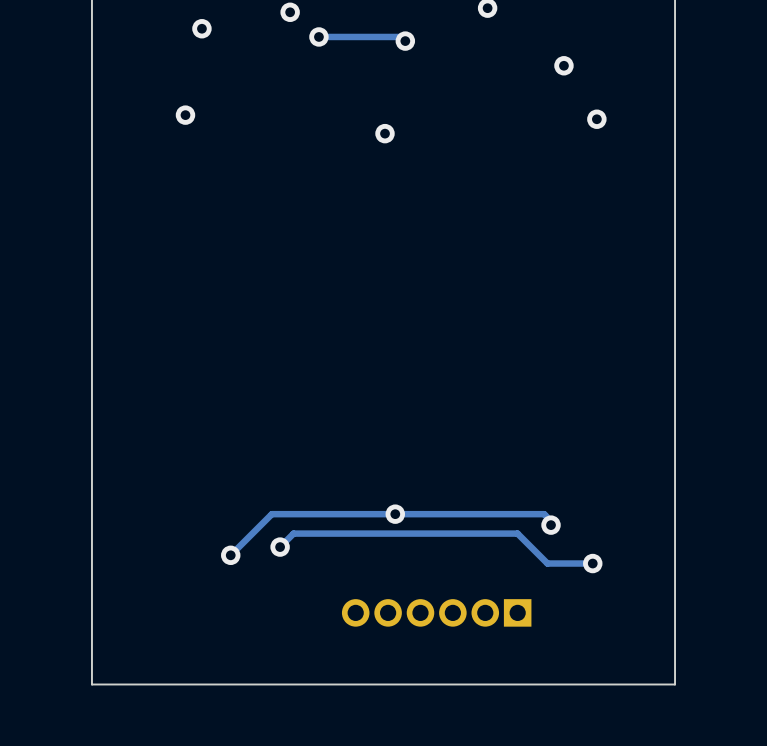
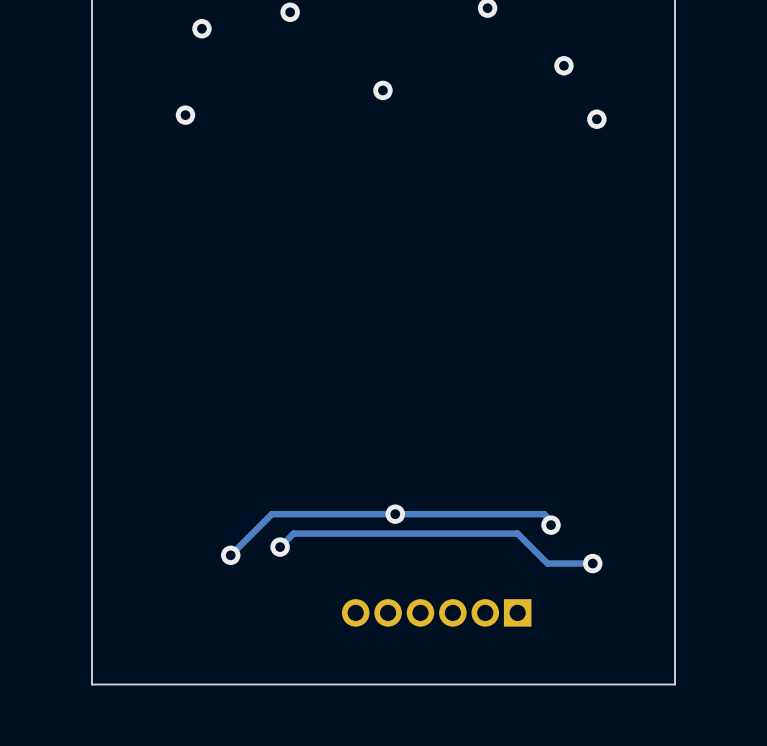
track: (318, 36) (401, 36) (405, 41) -> none
via: (318, 36) -> none
via: (405, 41) -> none
via: none -> (382, 90)
via: (385, 133) -> none

